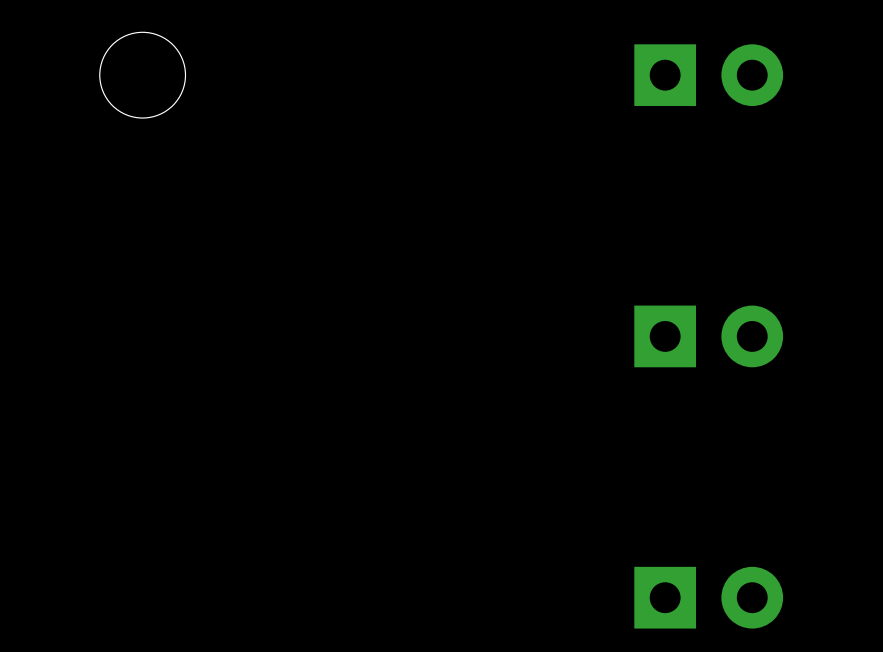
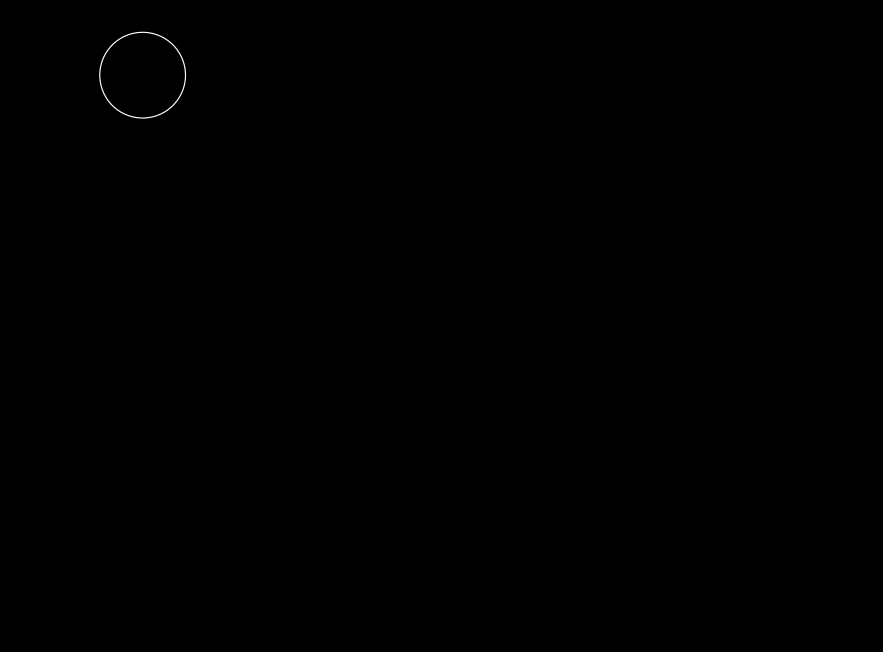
part: (708, 75) -> none
part: (708, 336) -> none
part: (708, 597) -> none

